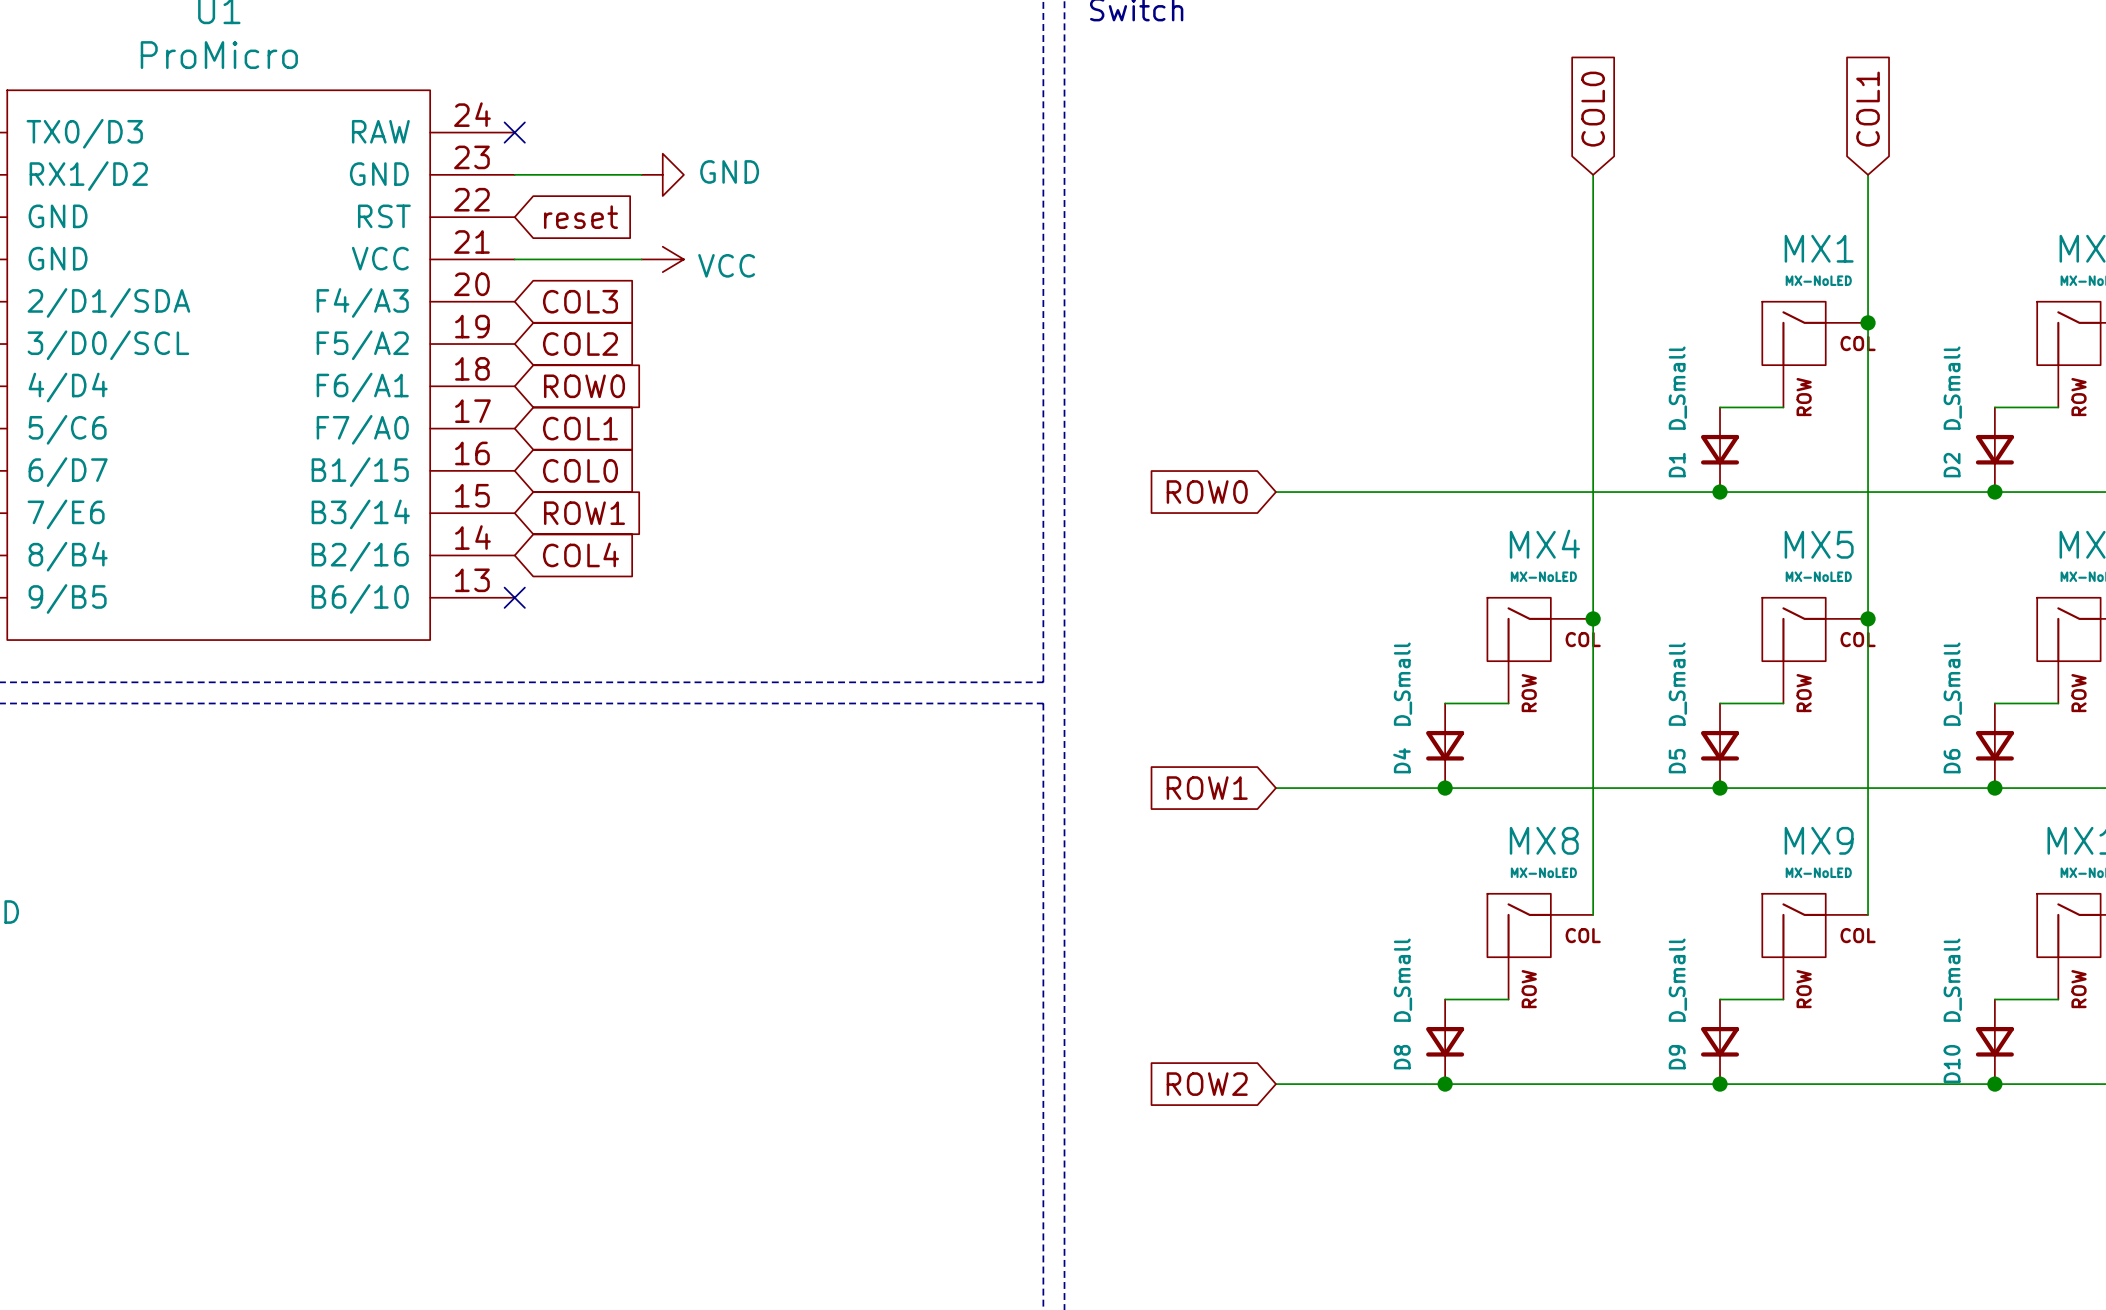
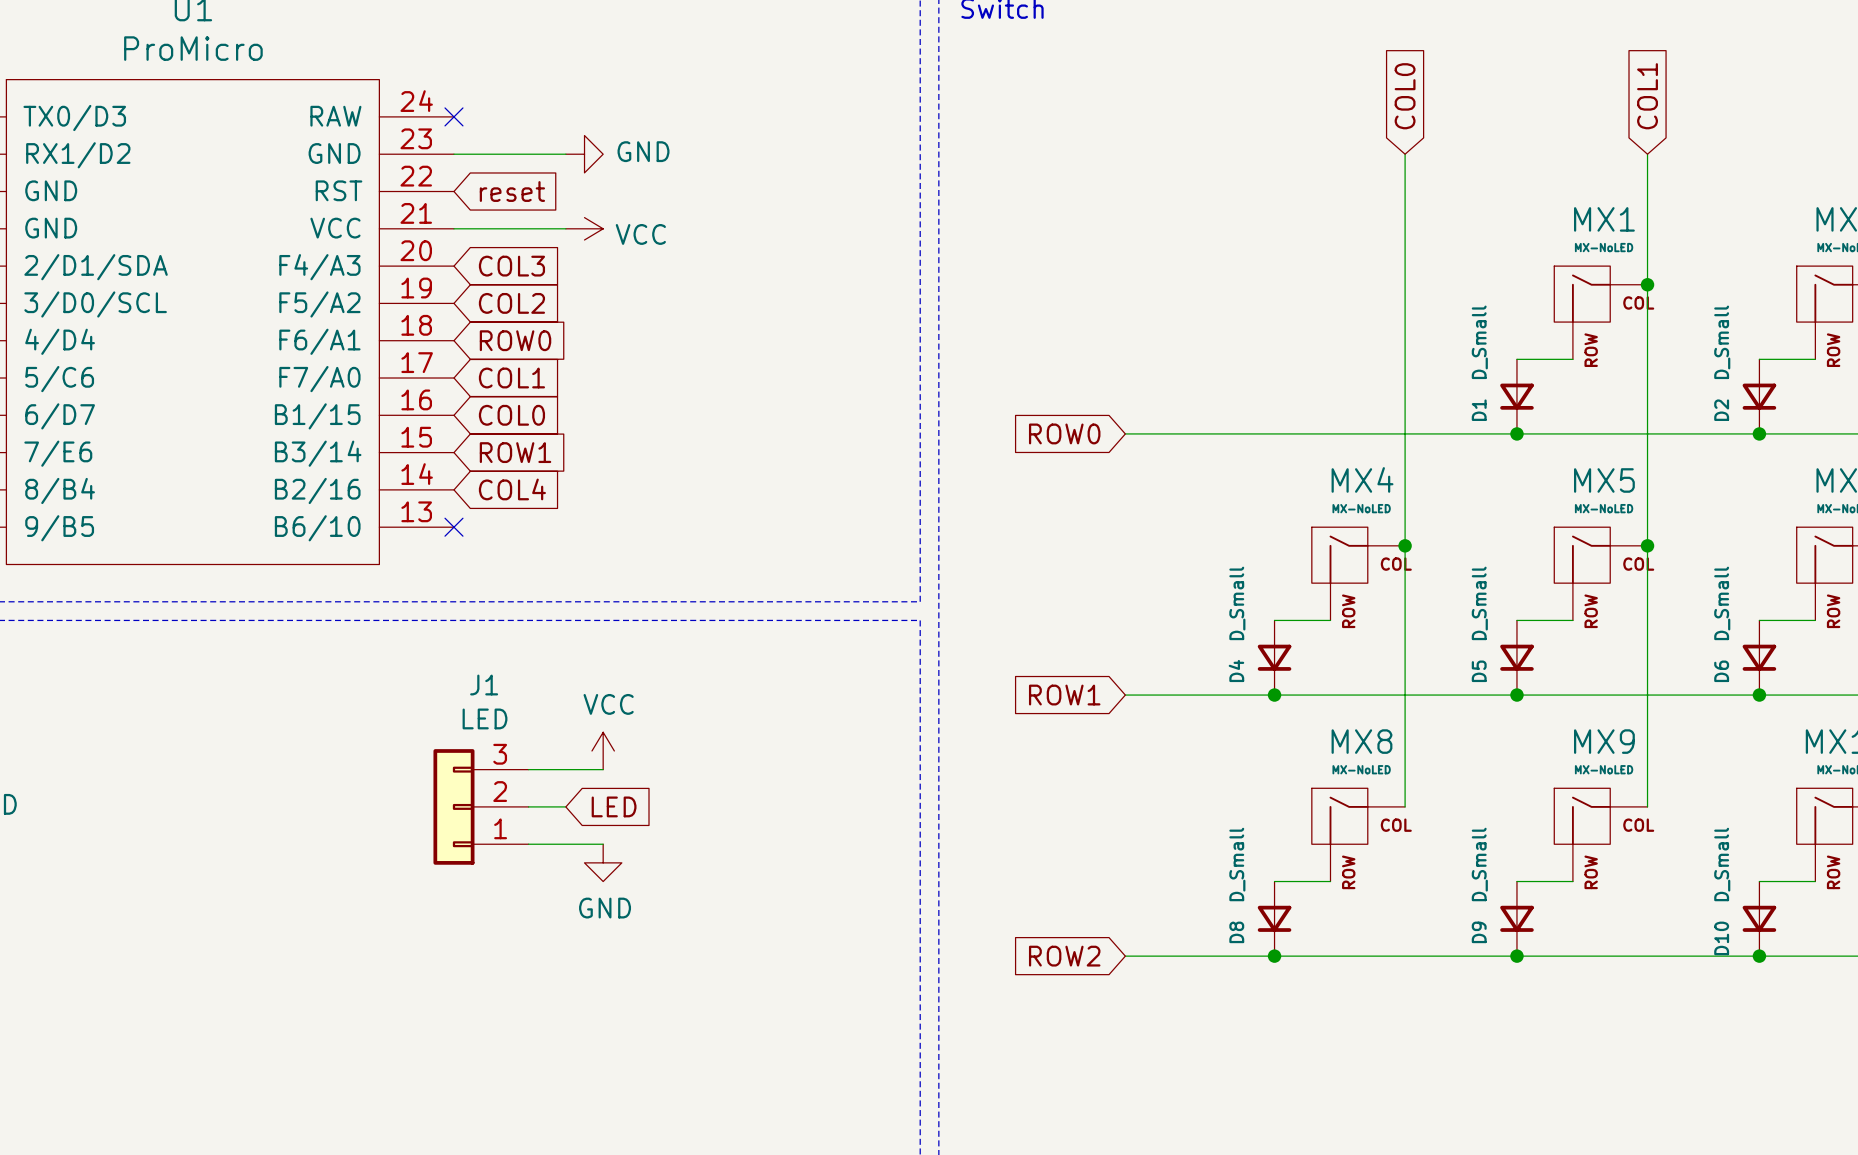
power symbol: none -> VCC (603, 750)
wire: none -> (528, 769) (603, 769)
J1: none -> LED (481, 806)
wire: none -> (528, 806) (565, 806)
global label: none -> LED (614, 806)
wire: none -> (528, 844) (603, 844)
power symbol: none -> GND (603, 862)

